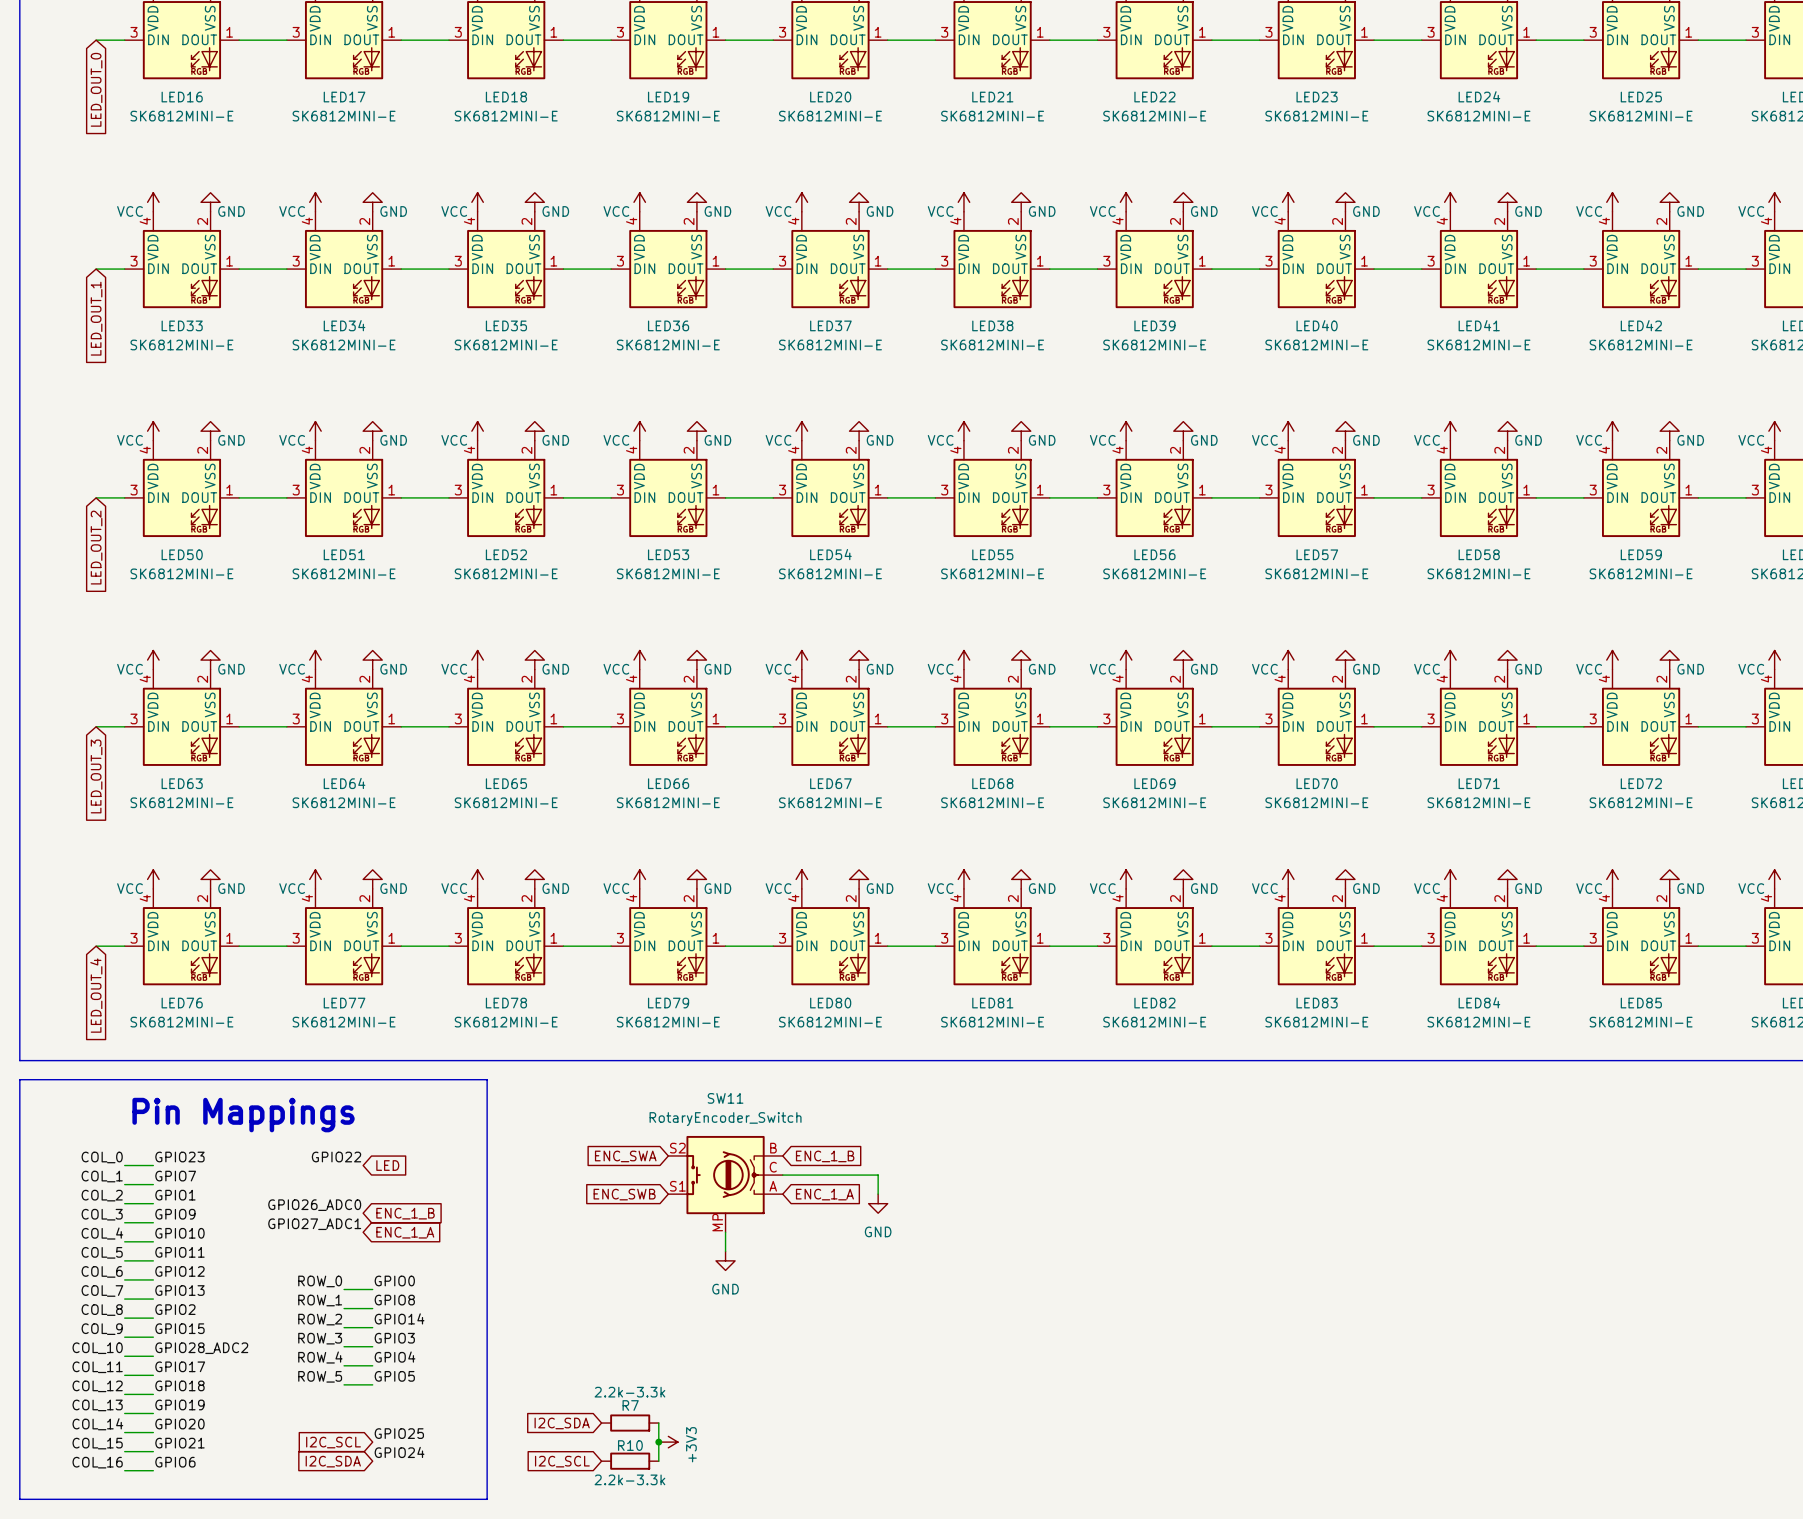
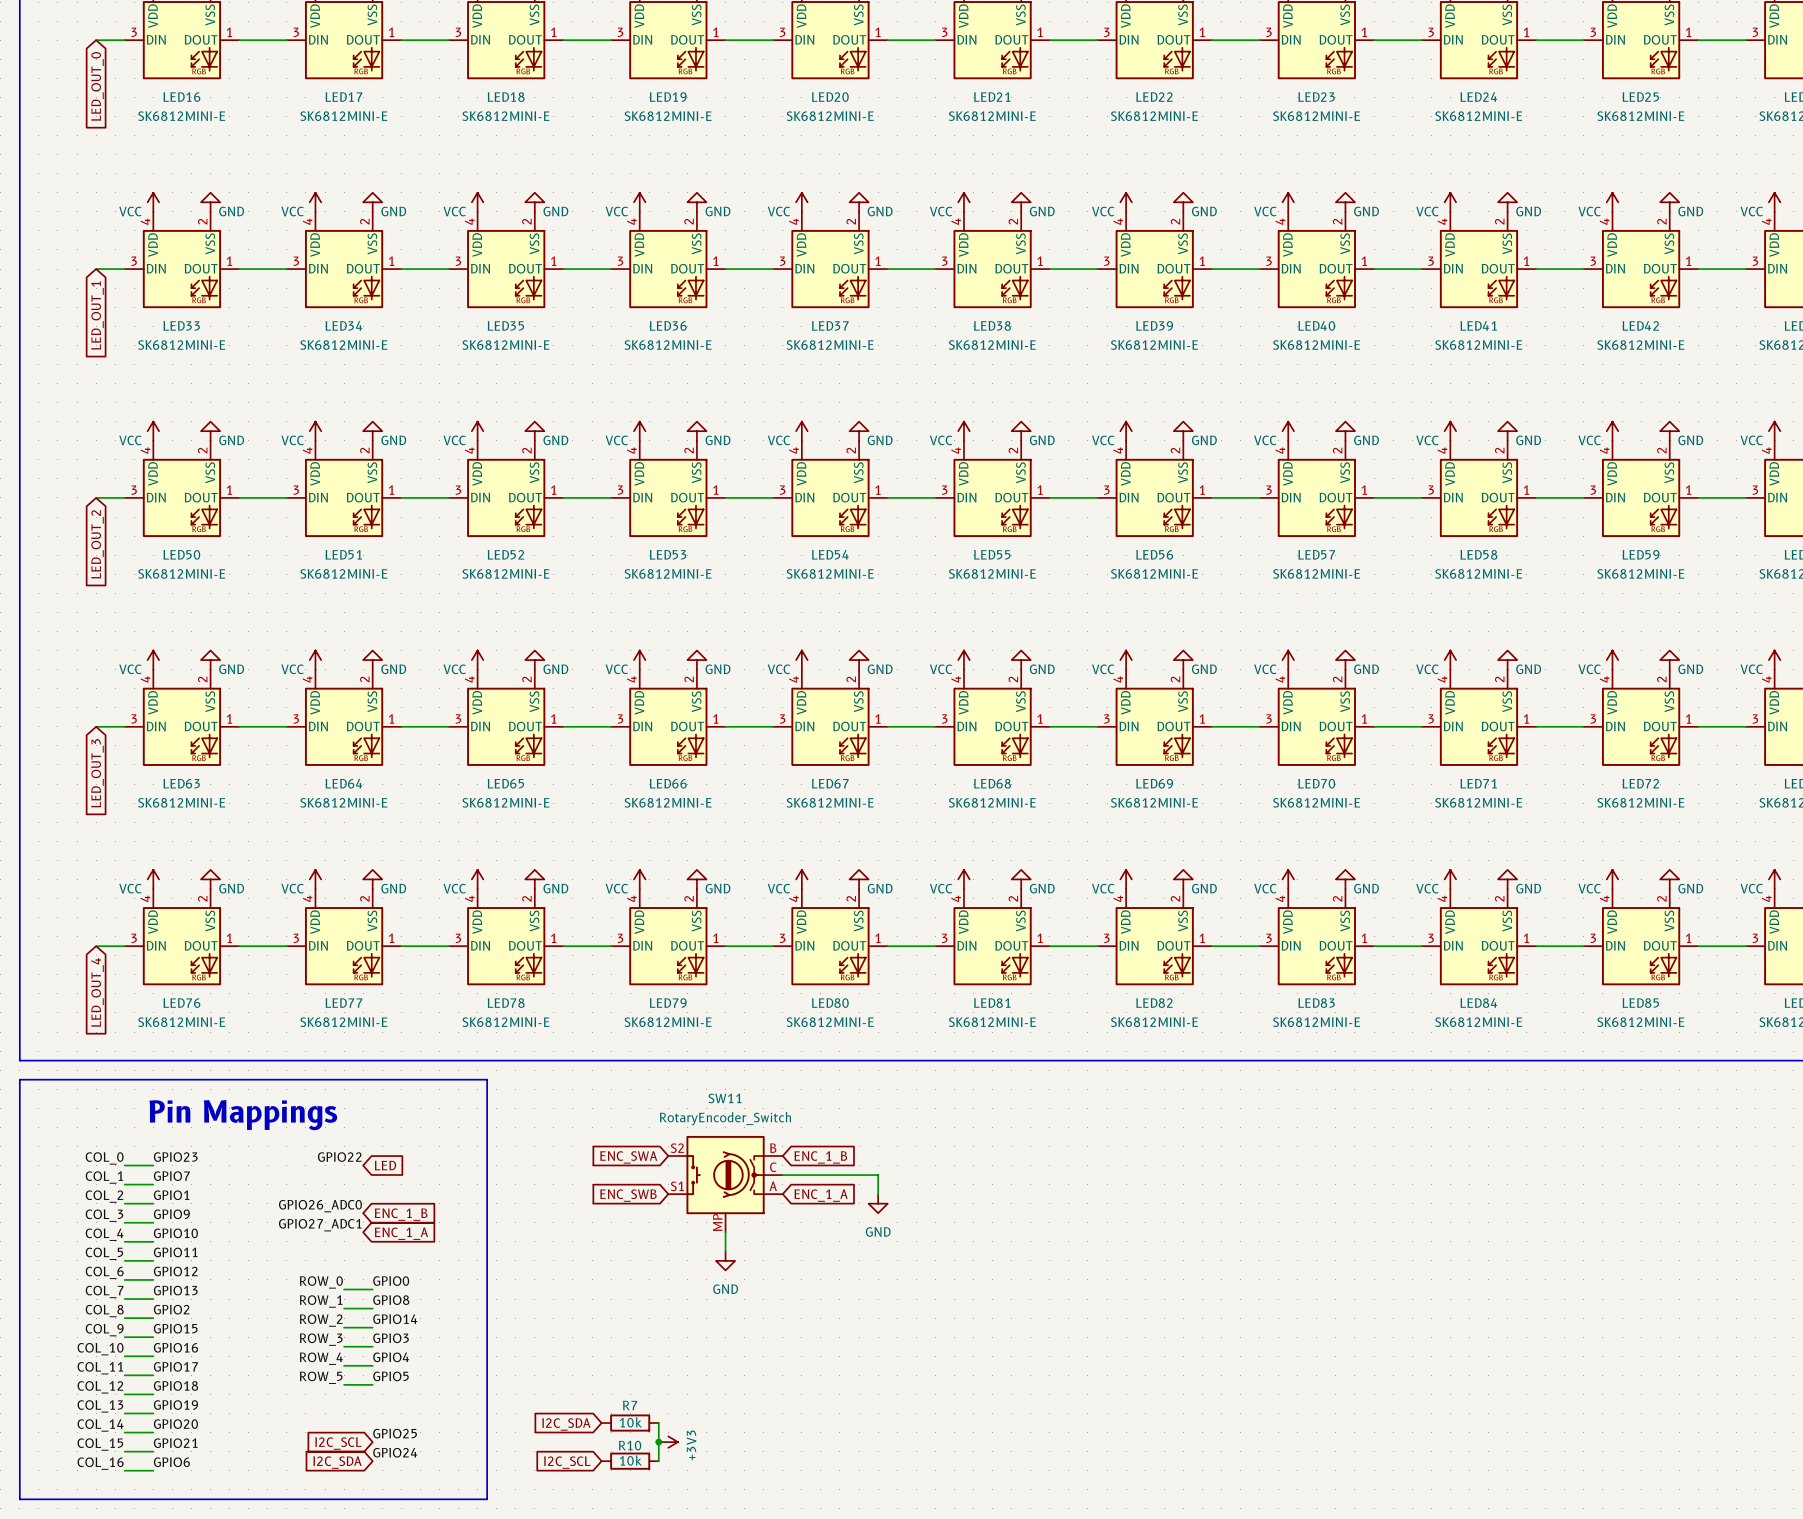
label: GPIO28_ADC2 (201, 1348) -> GPIO16 (175, 1347)
R7 value: 2.2k-3.3k (629, 1392) -> 10k (630, 1422)
R10 value: 2.2k-3.3k (629, 1479) -> 10k (630, 1460)

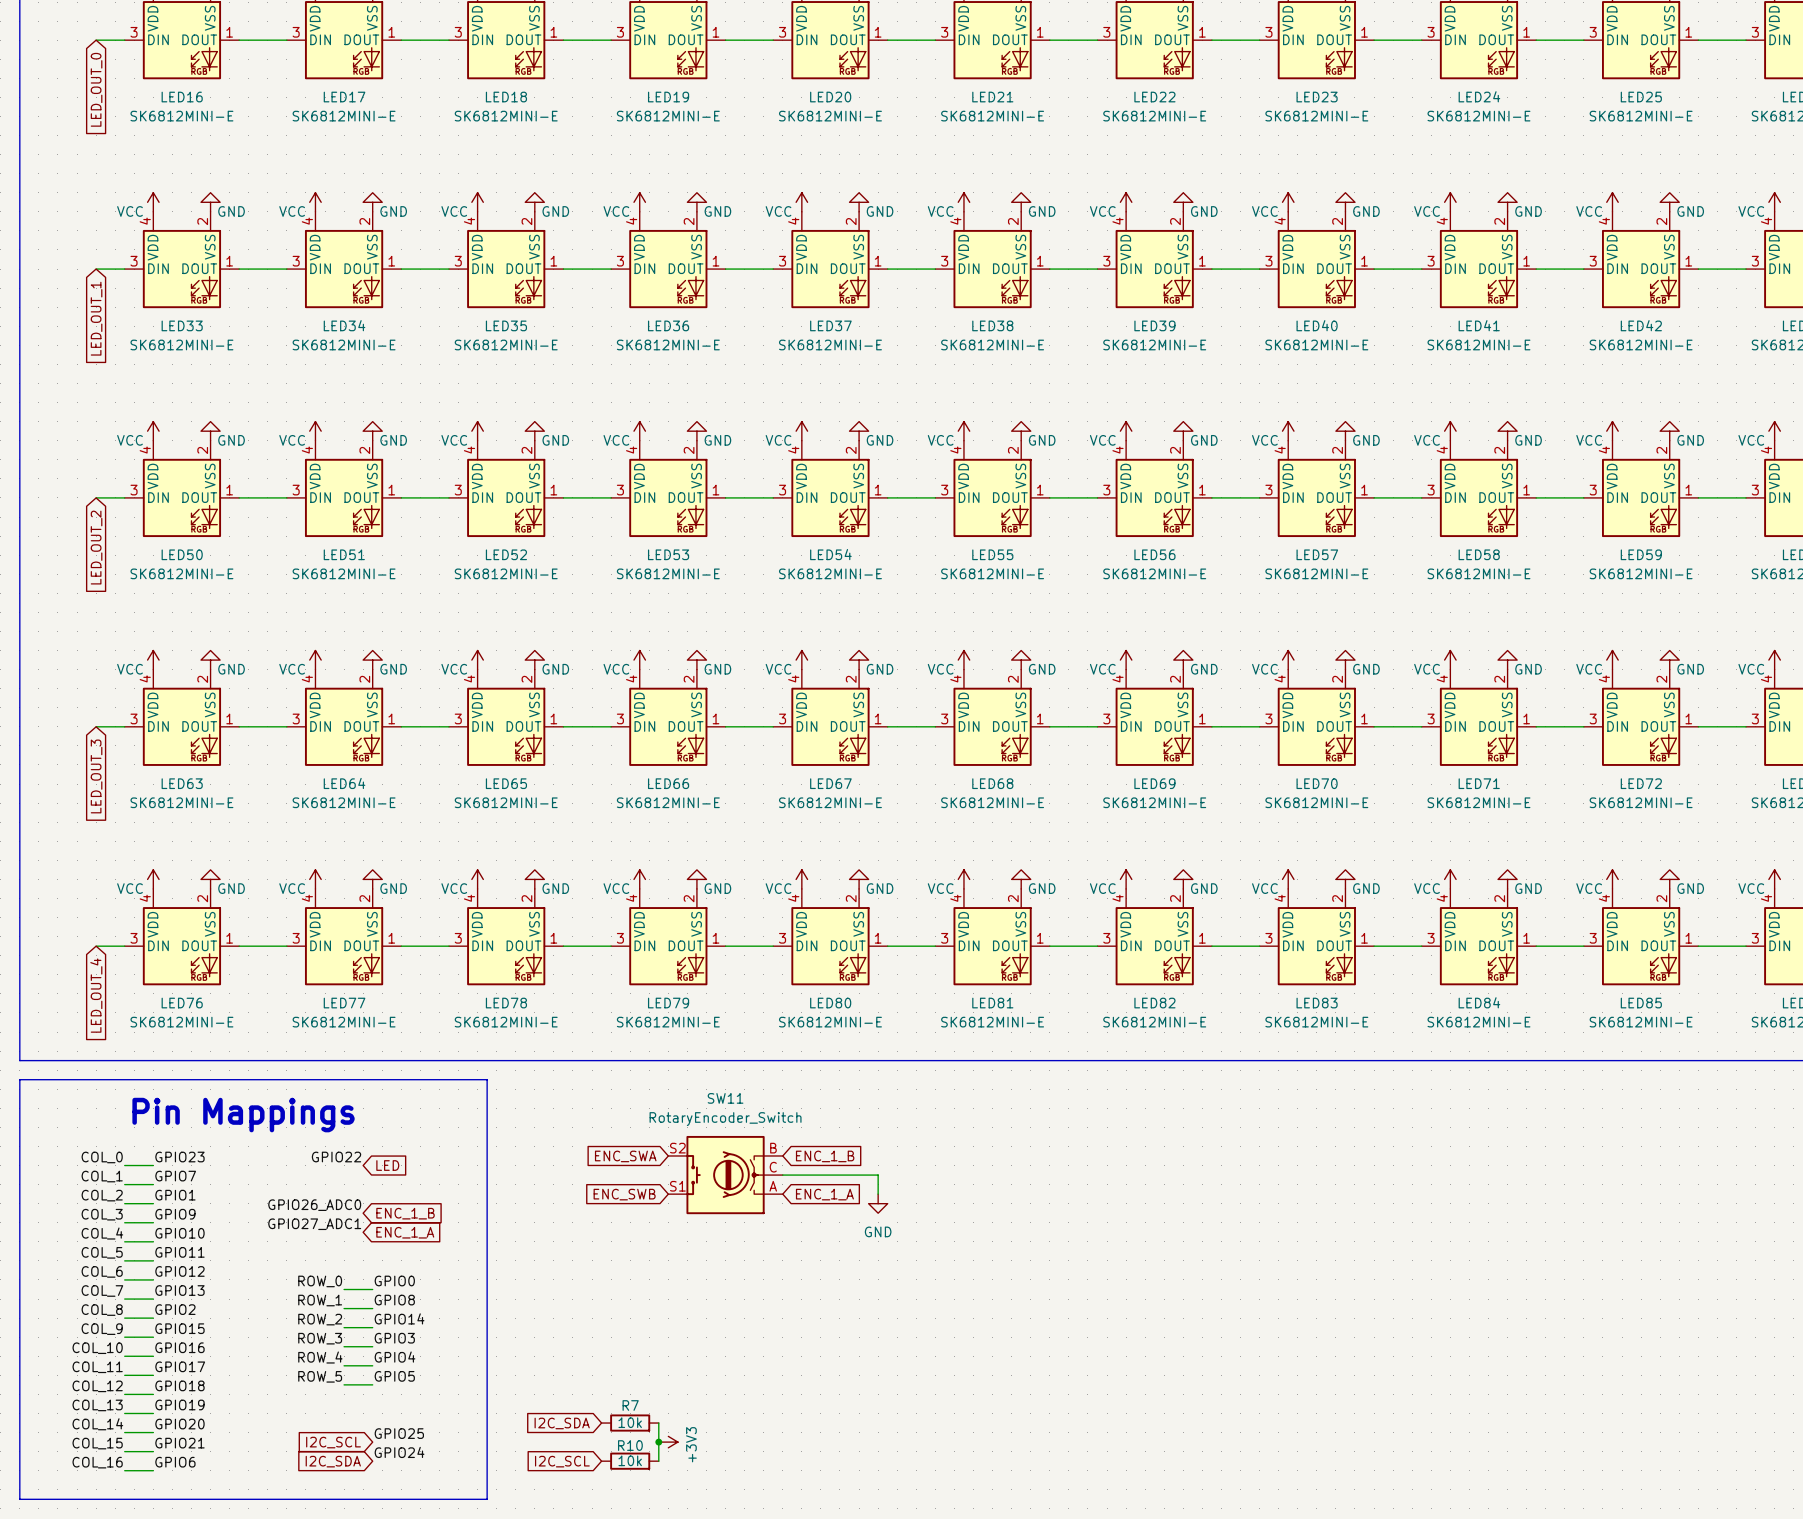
SW11 symbol: [668, 1135, 783, 1233] -> [668, 1135, 783, 1215]
wire: (725, 1232) (725, 1251) -> none
power symbol: GND (725, 1260) -> none

